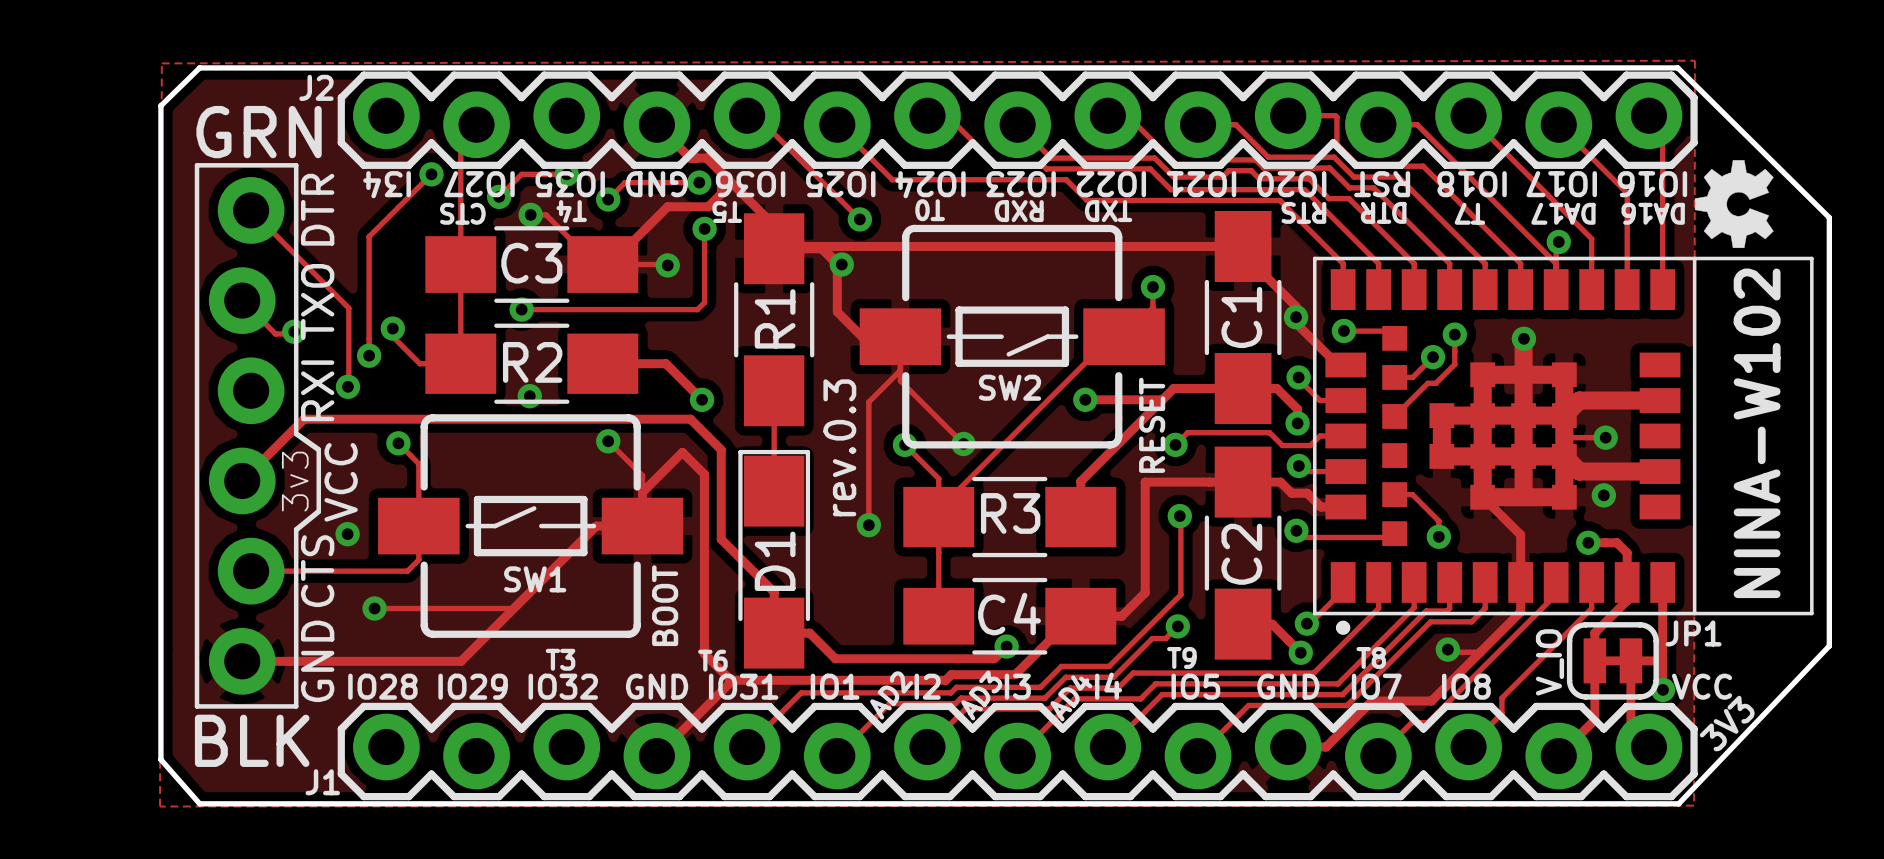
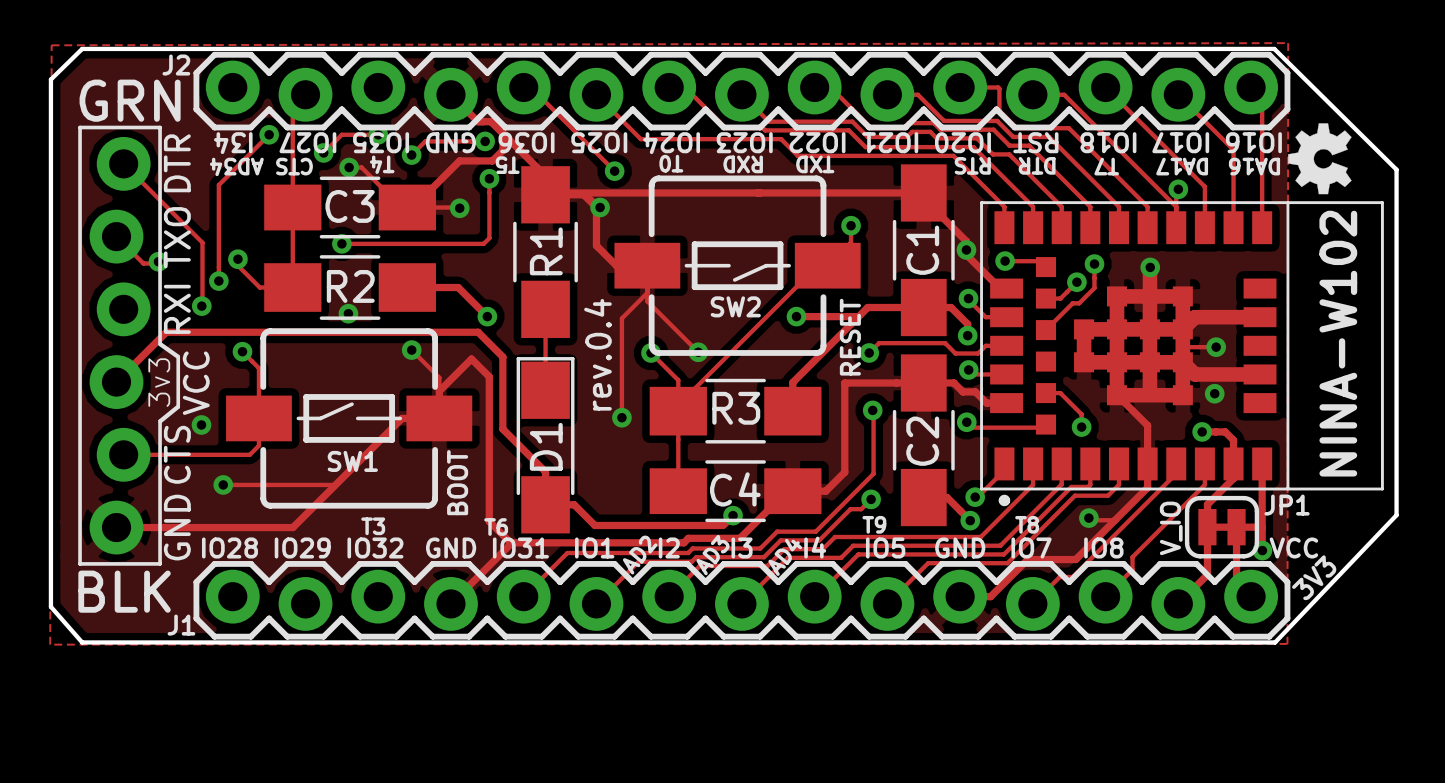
text: none -> AD34 (236, 166)
text: rev.0.3 (839, 447) -> rev.0.4 (597, 354)

